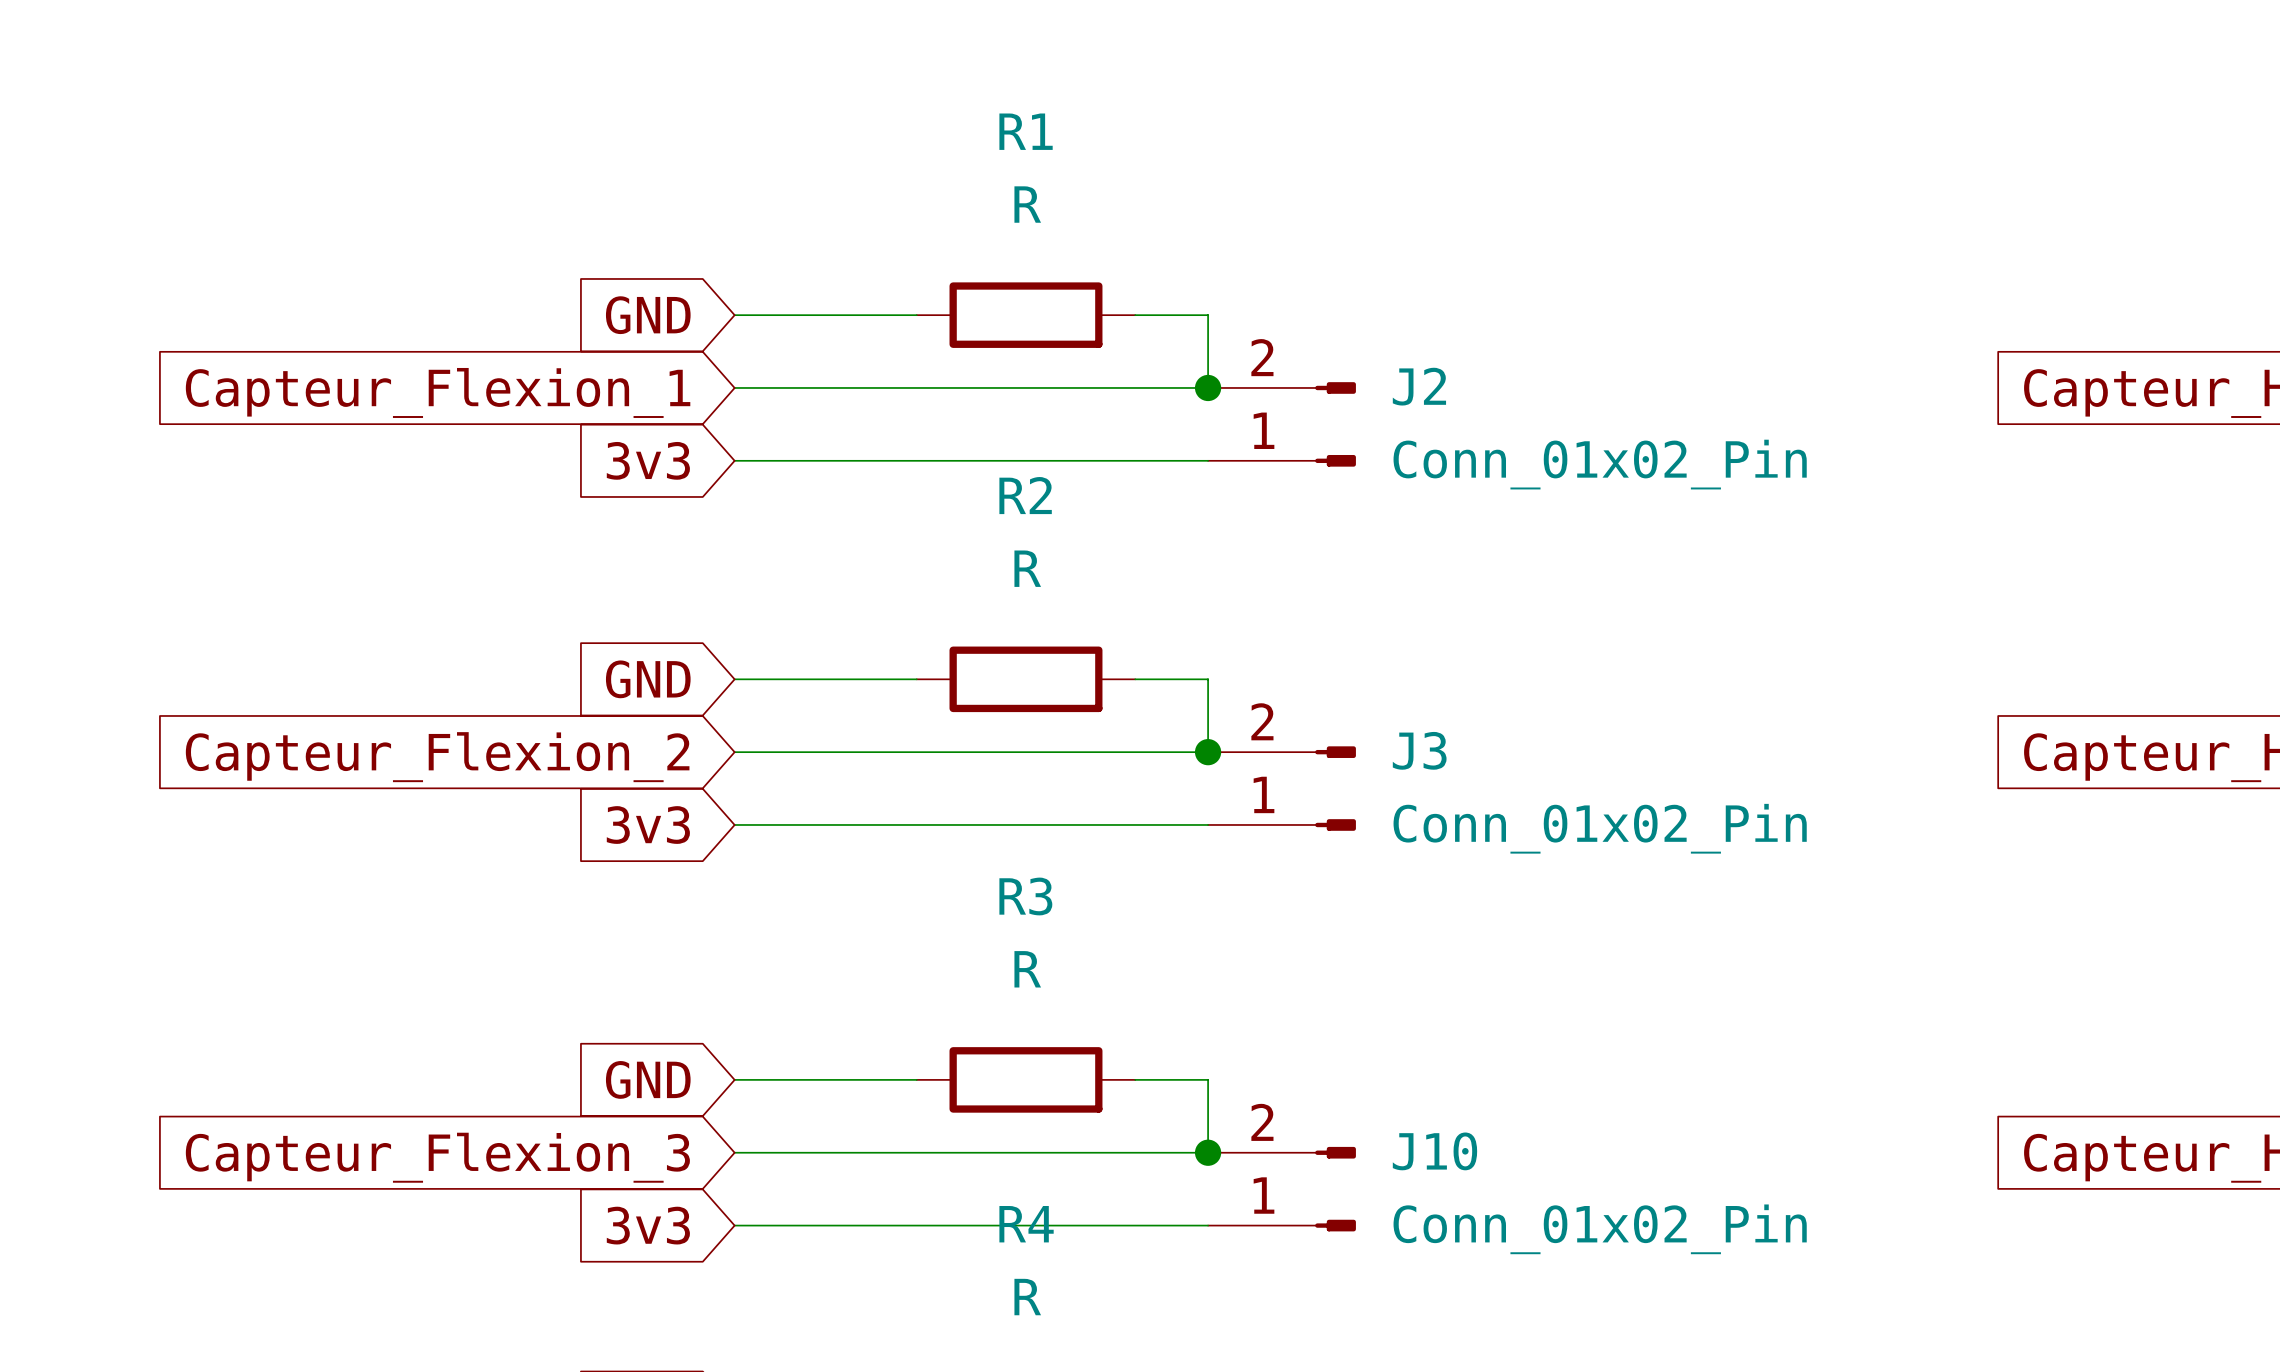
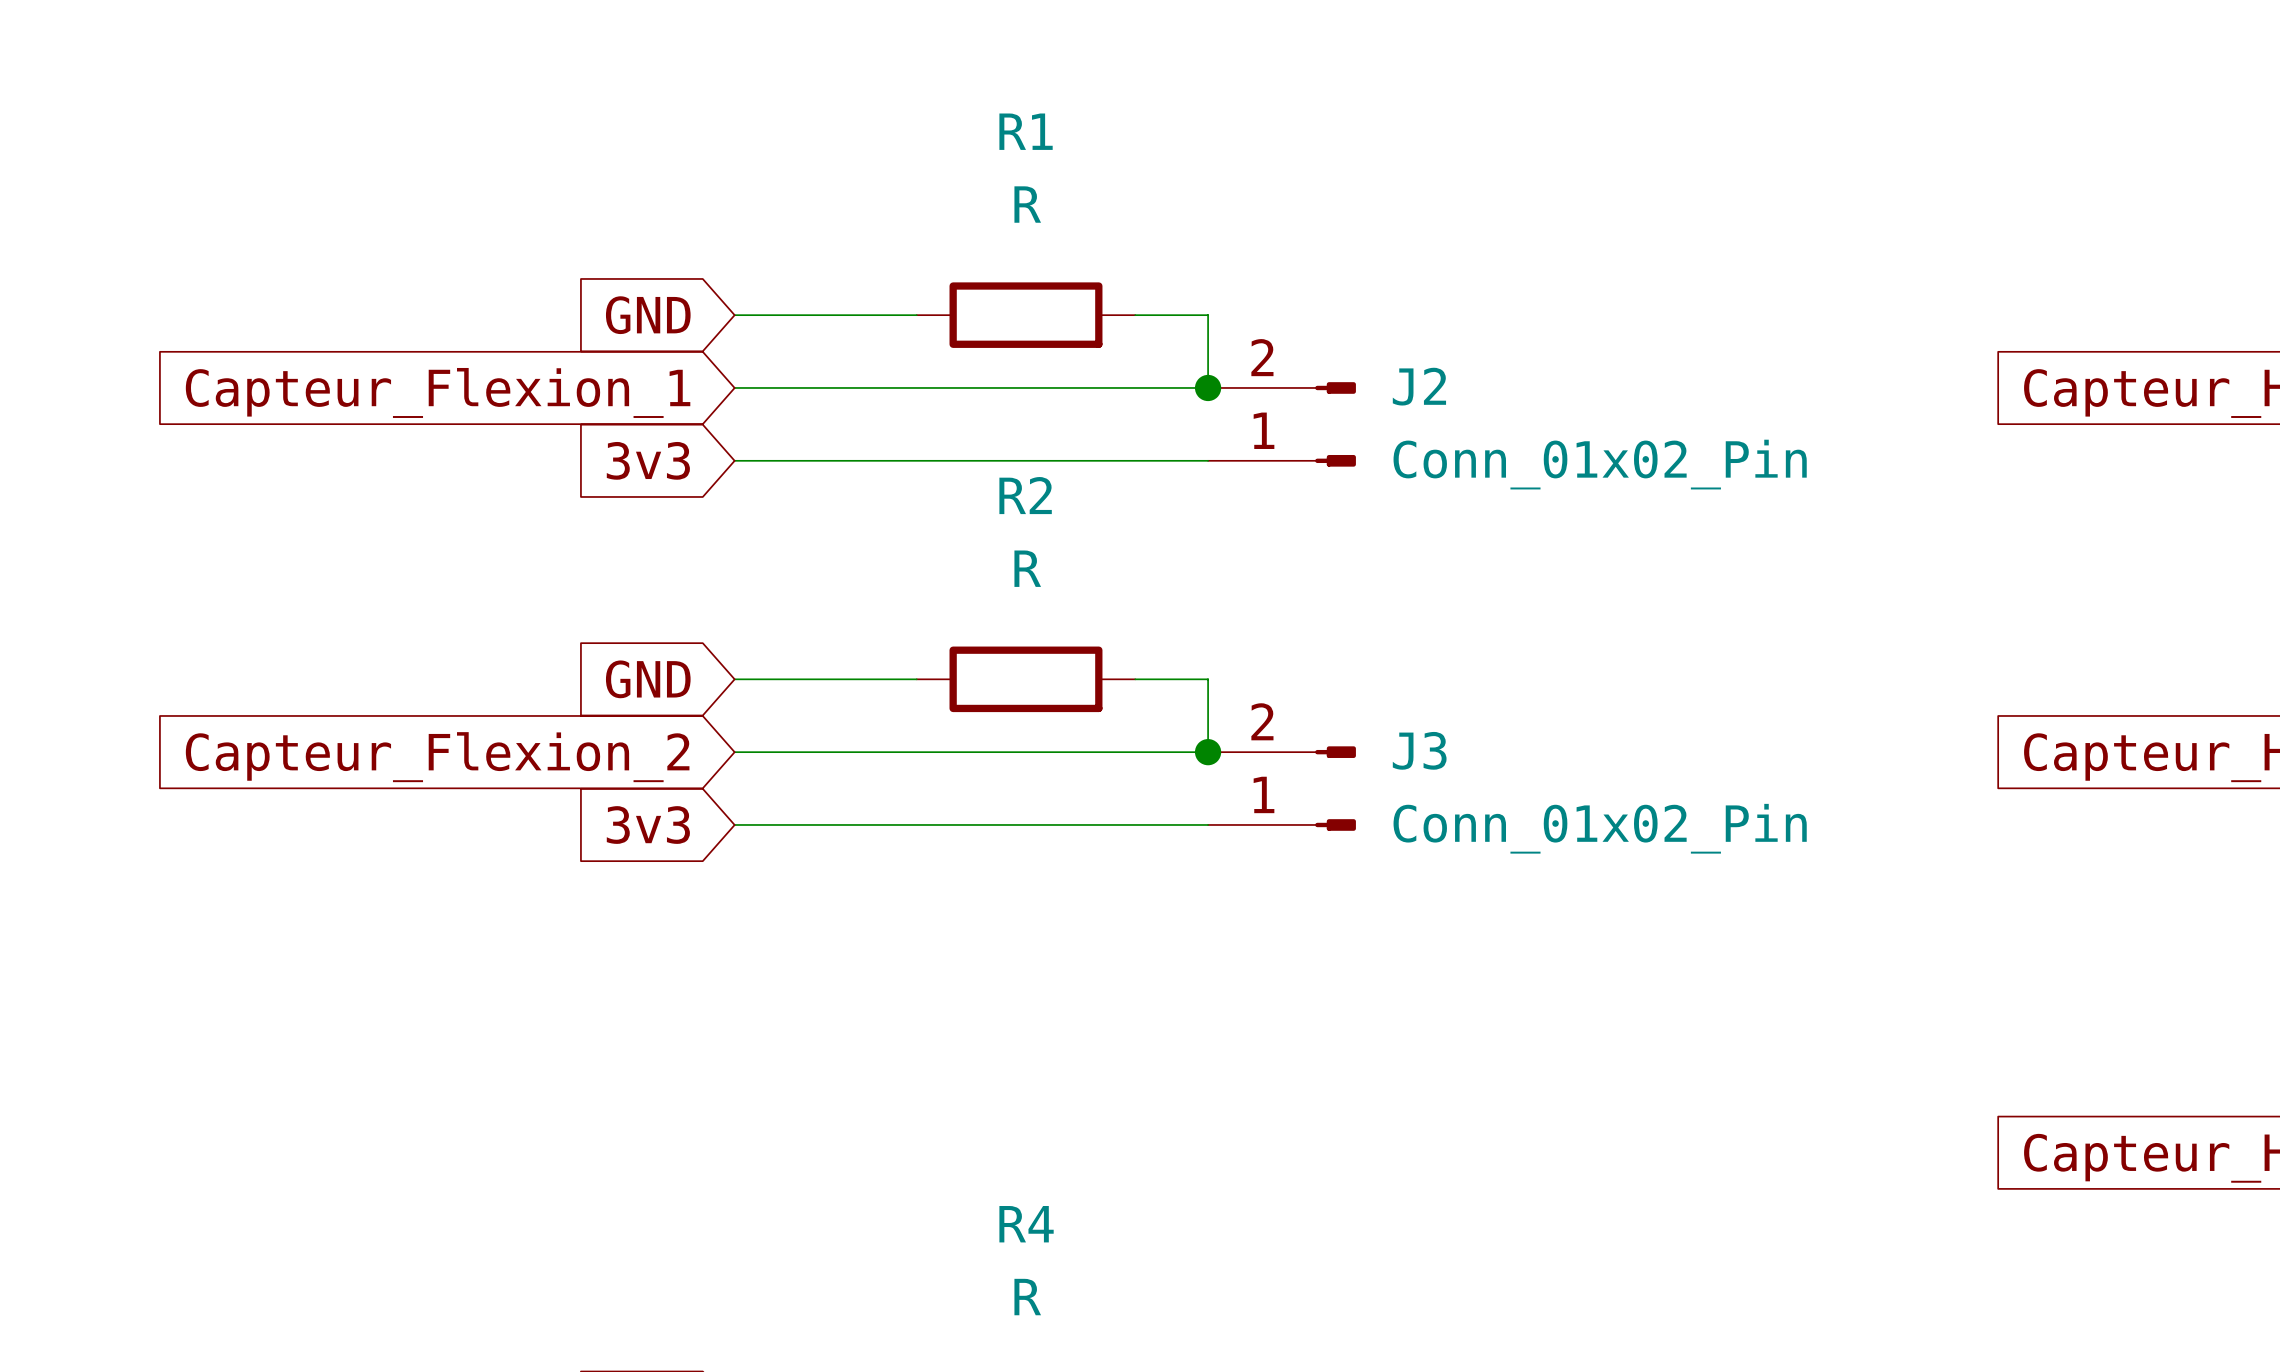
global label: GND (648, 1079) -> none
wire: (734, 1079) (916, 1079) -> none
R3: R (1025, 1079) -> none
wire: (1135, 1079) (1208, 1079) (1208, 1152) (734, 1152) -> none
junction: (1208, 1152) -> none
global label: Capteur_Flexion_3 (437, 1157) -> none
J10: Conn_01x02_Pin (1282, 1189) -> none
global label: 3v3 (648, 1225) -> none
wire: (734, 1225) (1208, 1225) -> none

